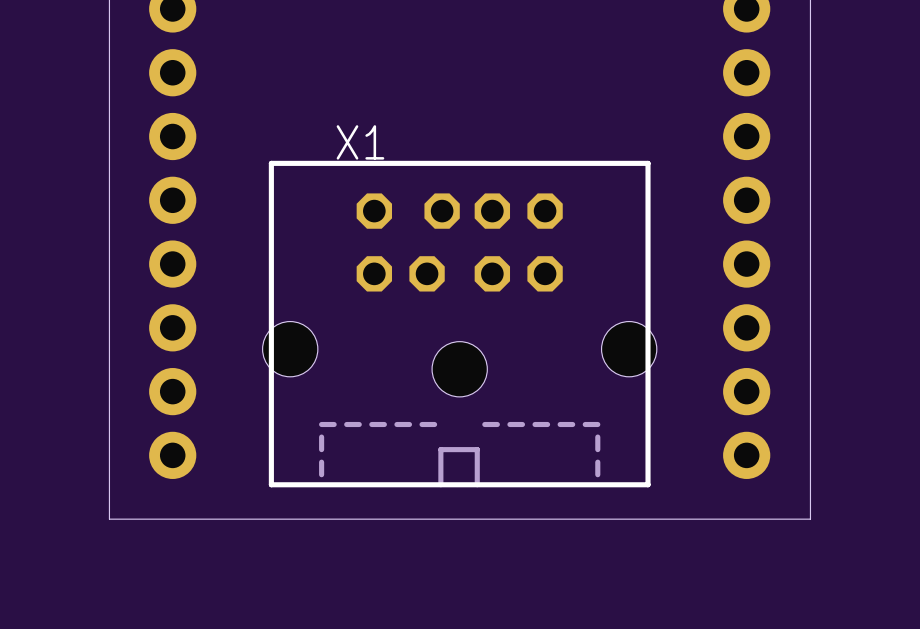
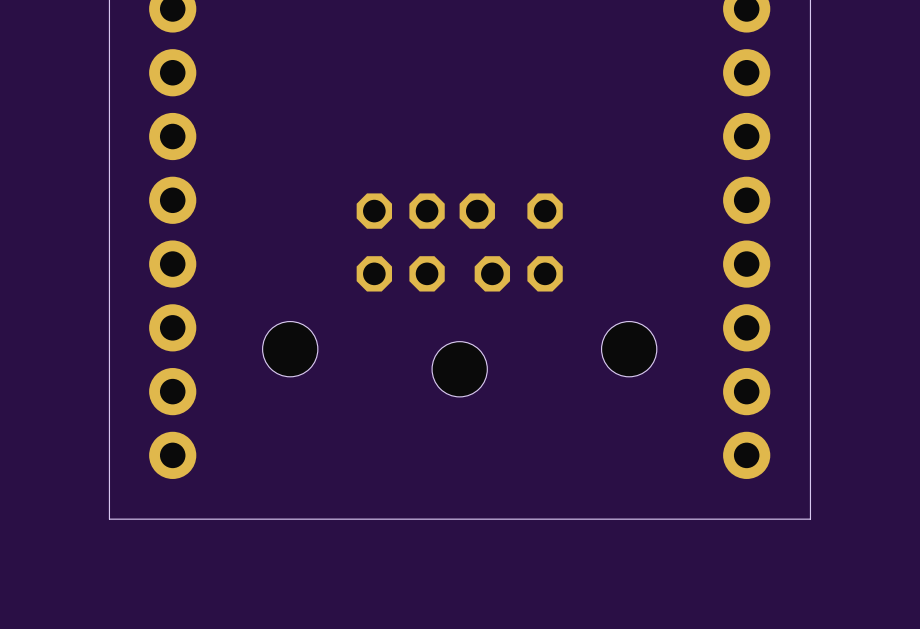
X1 side: bottom (459, 324) -> top (459, 295)

